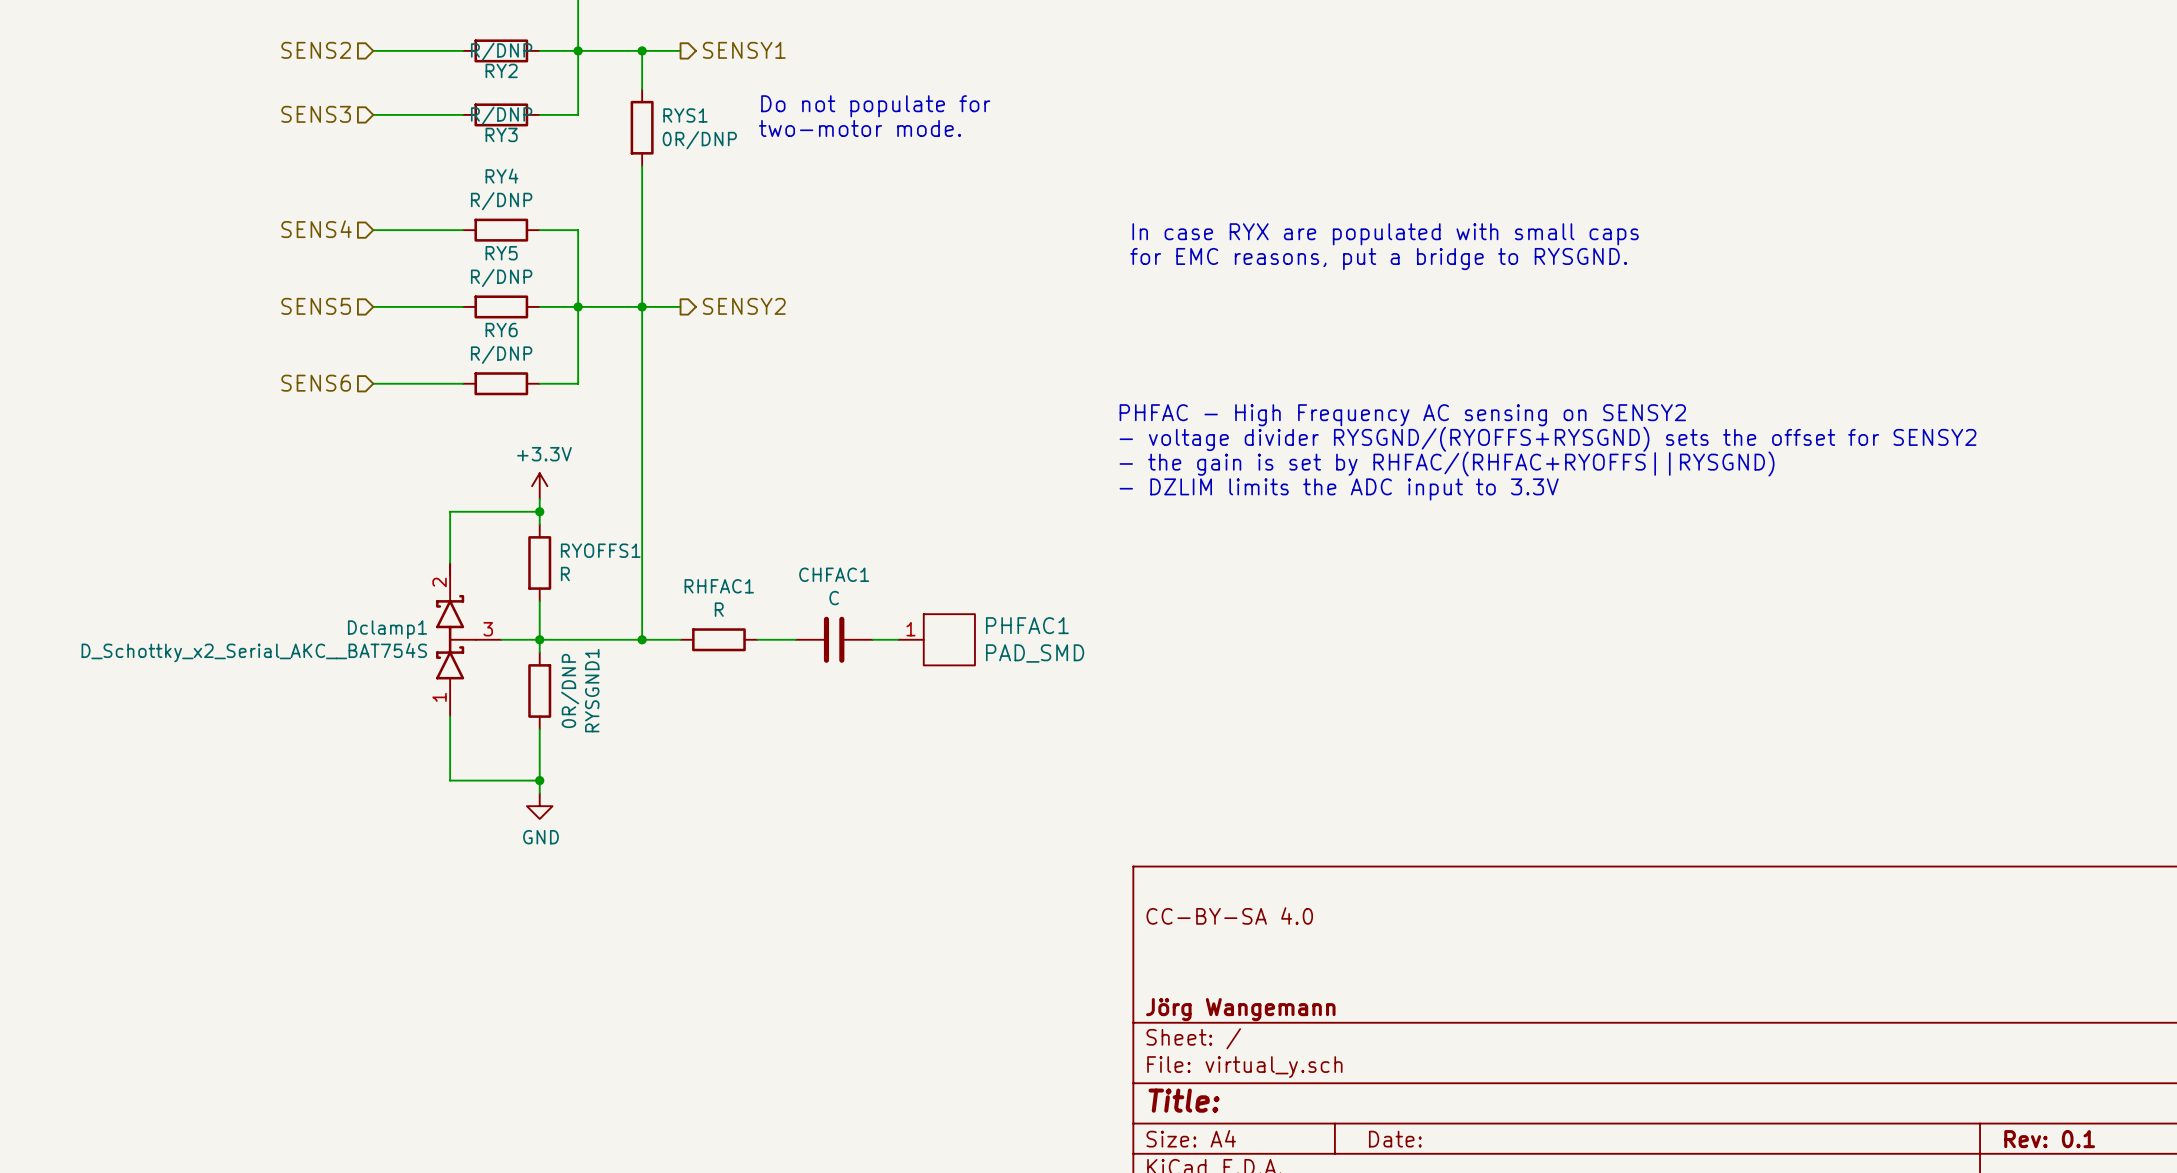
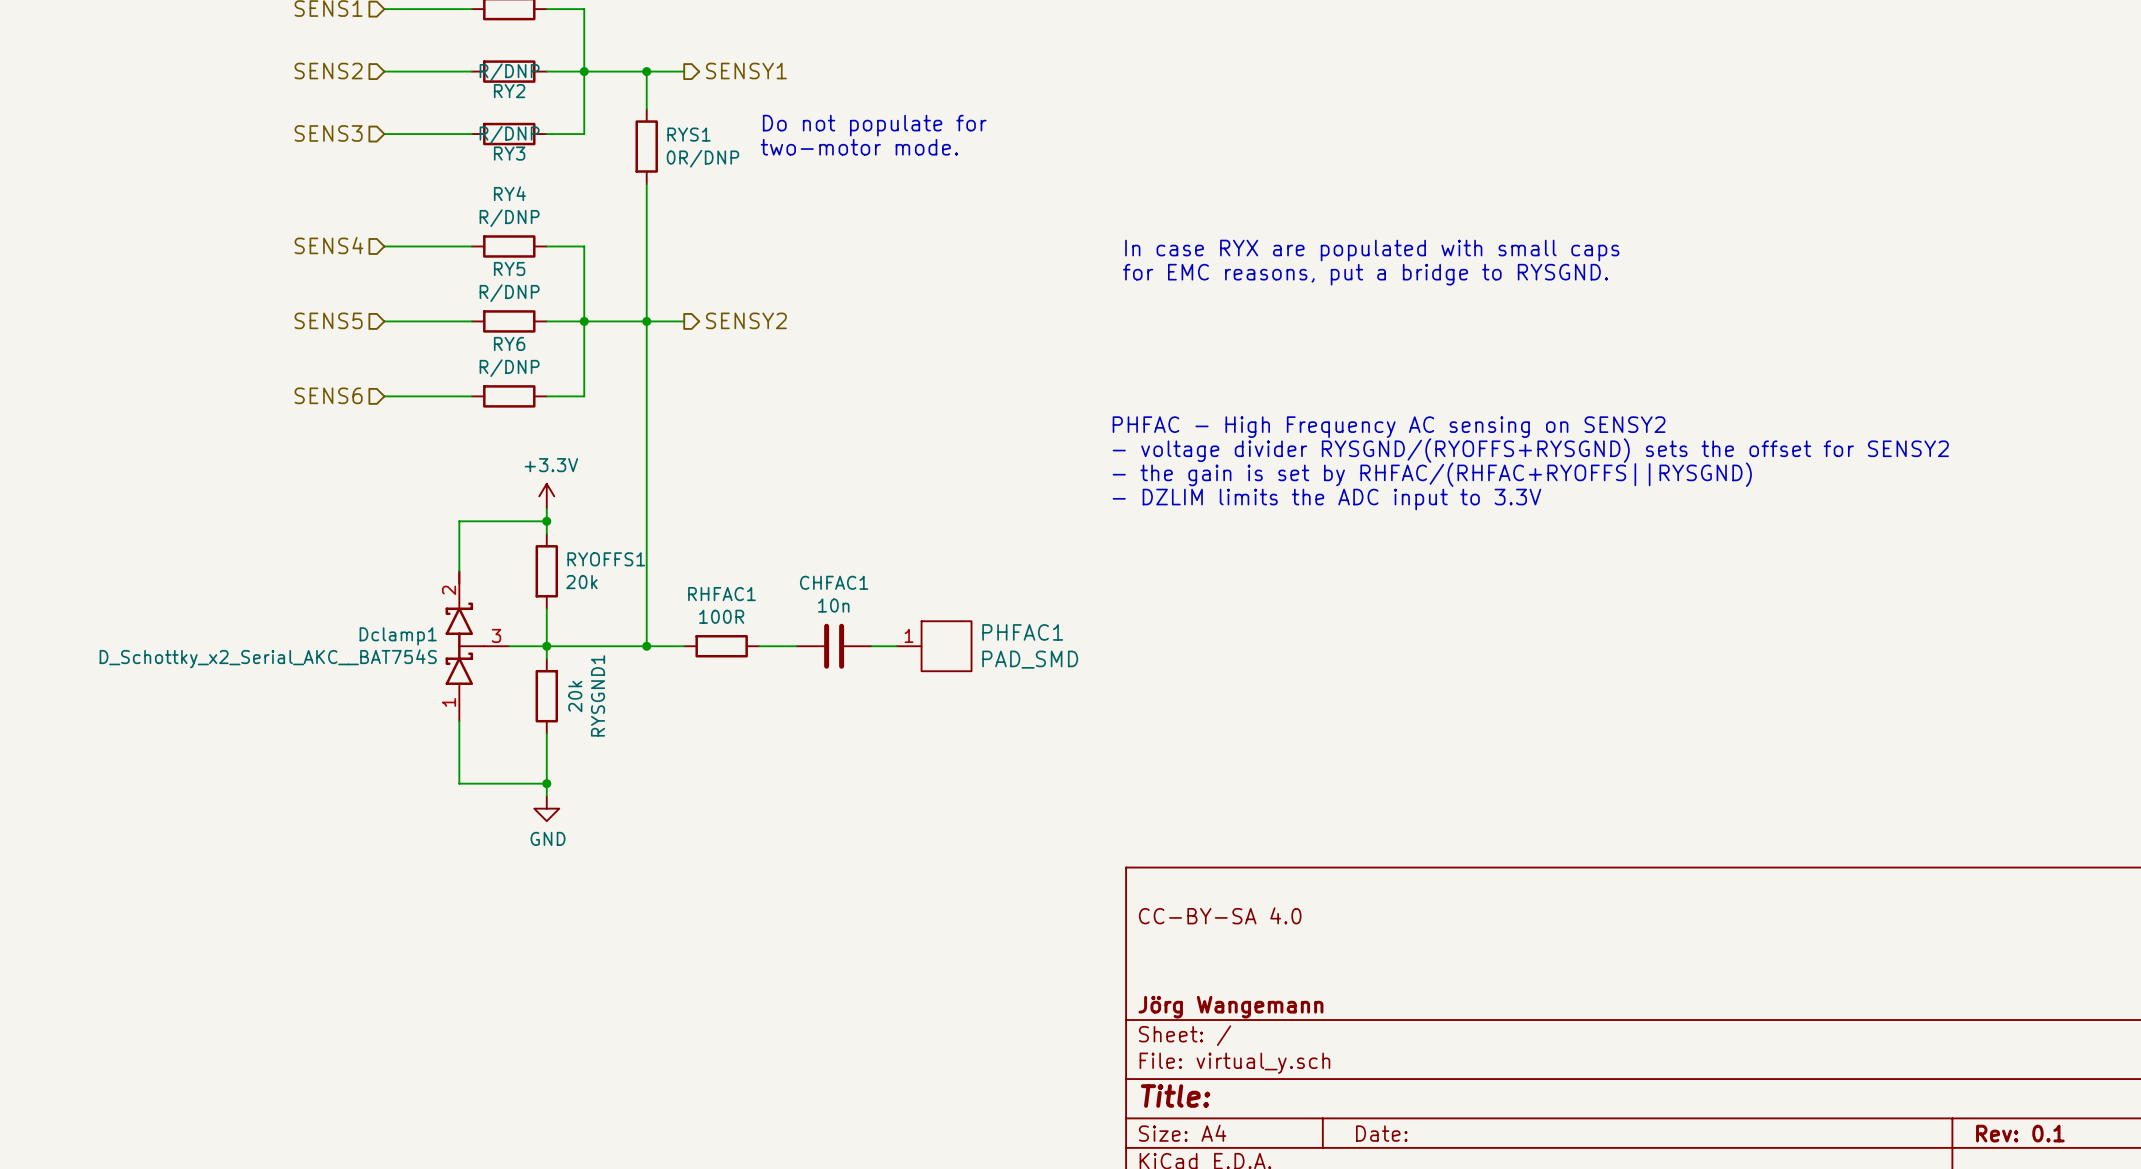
RYOFFS1 value: R (565, 574) -> 20k (581, 582)
CHFAC1 value: C (834, 598) -> 10n (833, 605)
RHFAC1 value: R (719, 609) -> 100R (721, 616)
RYSGND1 value: 0R/DNP (570, 690) -> 20k (575, 696)

